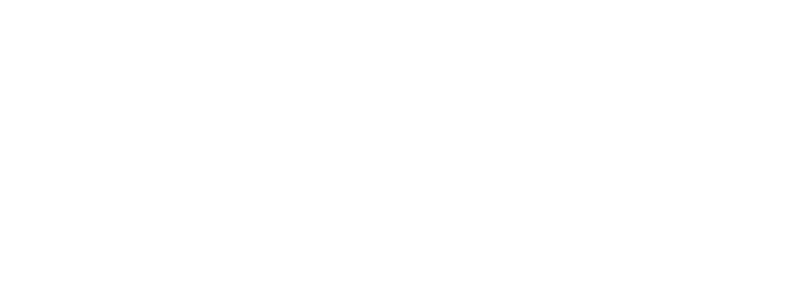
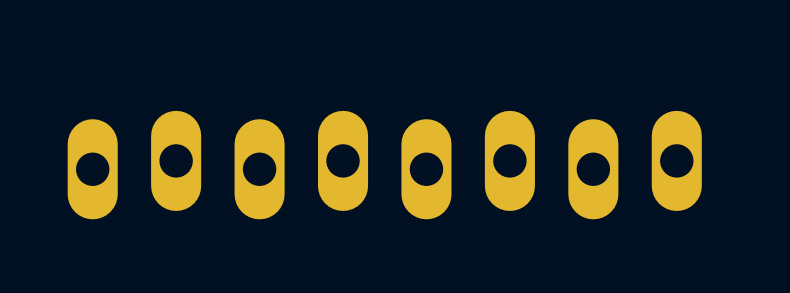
part: none -> (384, 165)

